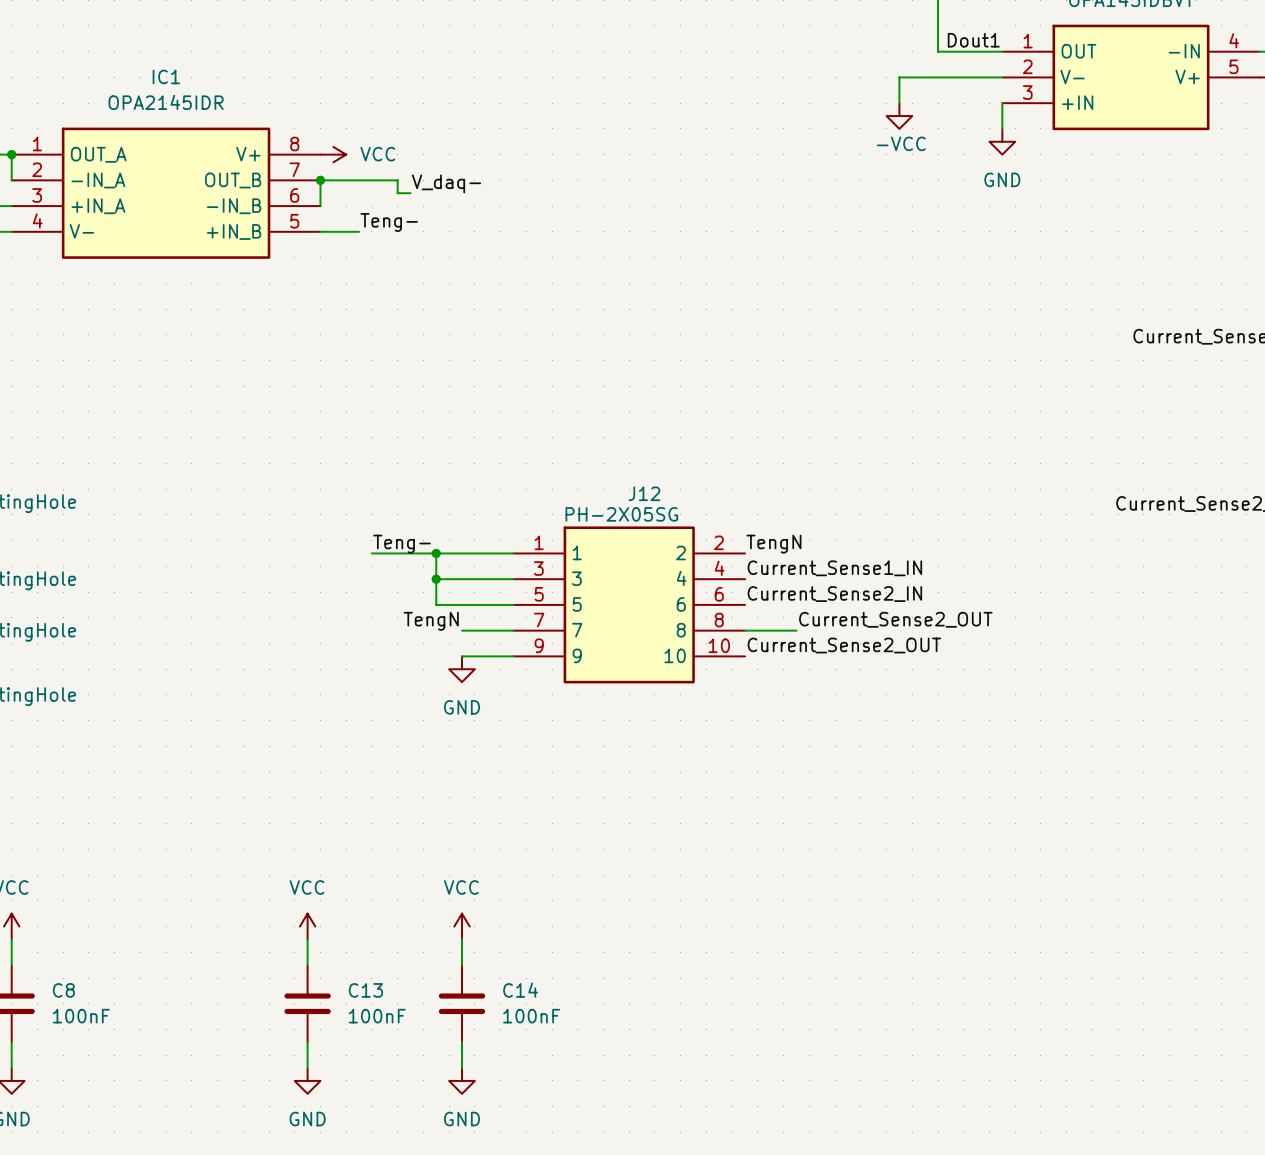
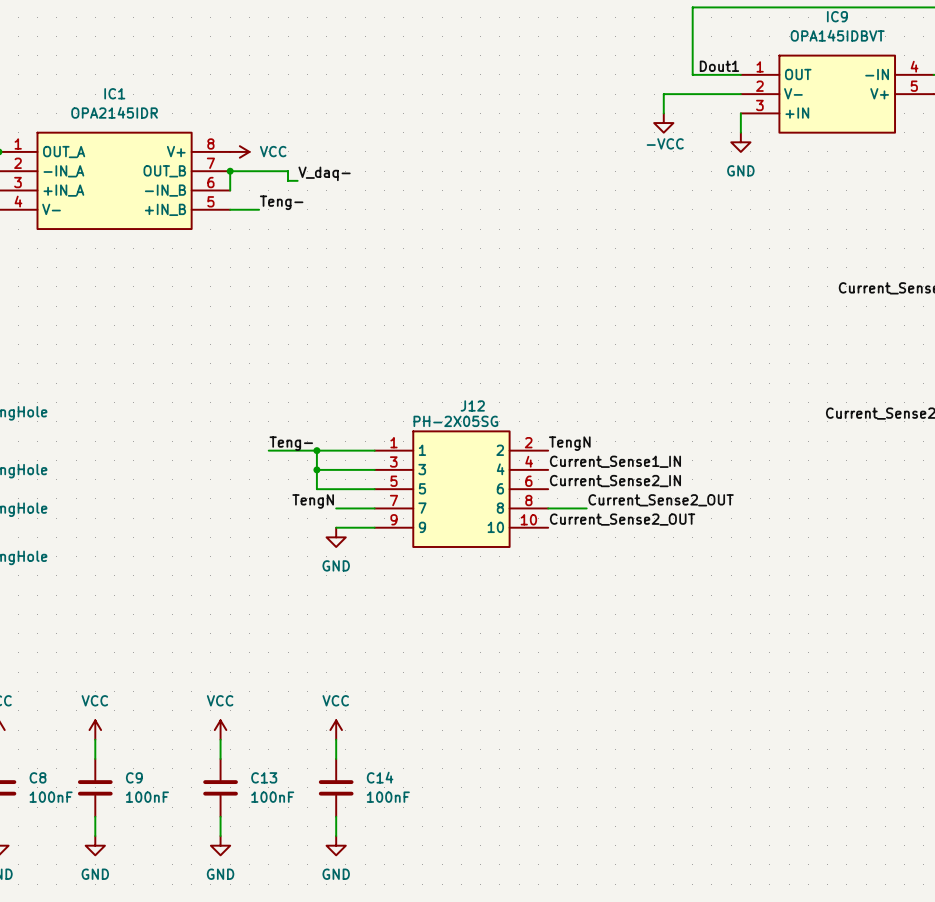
power symbol: none -> VCC (95, 730)
wire: none -> (95, 739) (95, 758)
C9: none -> 100nF (95, 787)
wire: none -> (95, 816) (95, 836)
power symbol: none -> GND (95, 845)

